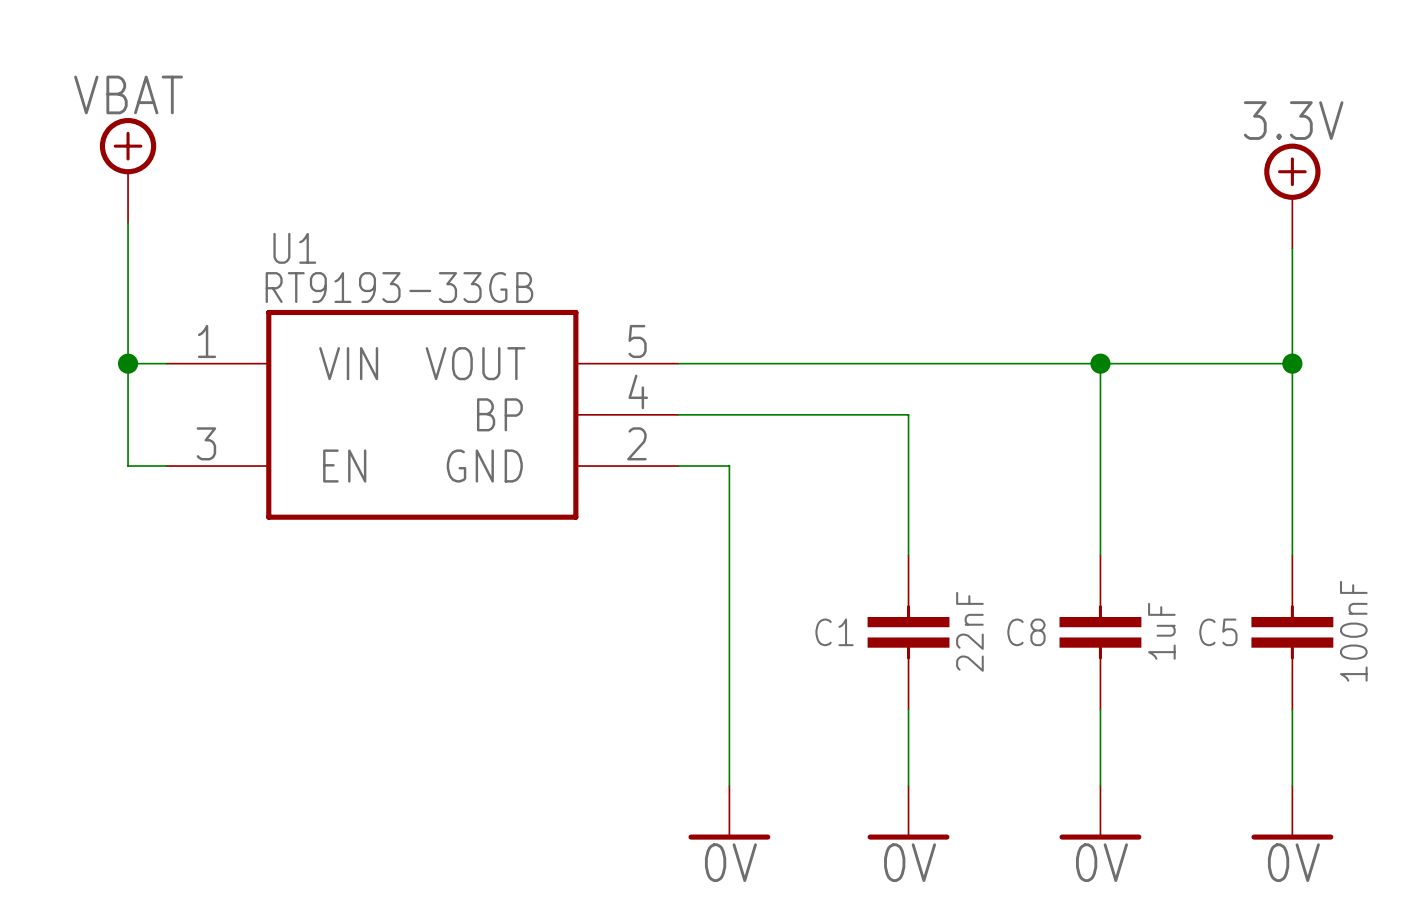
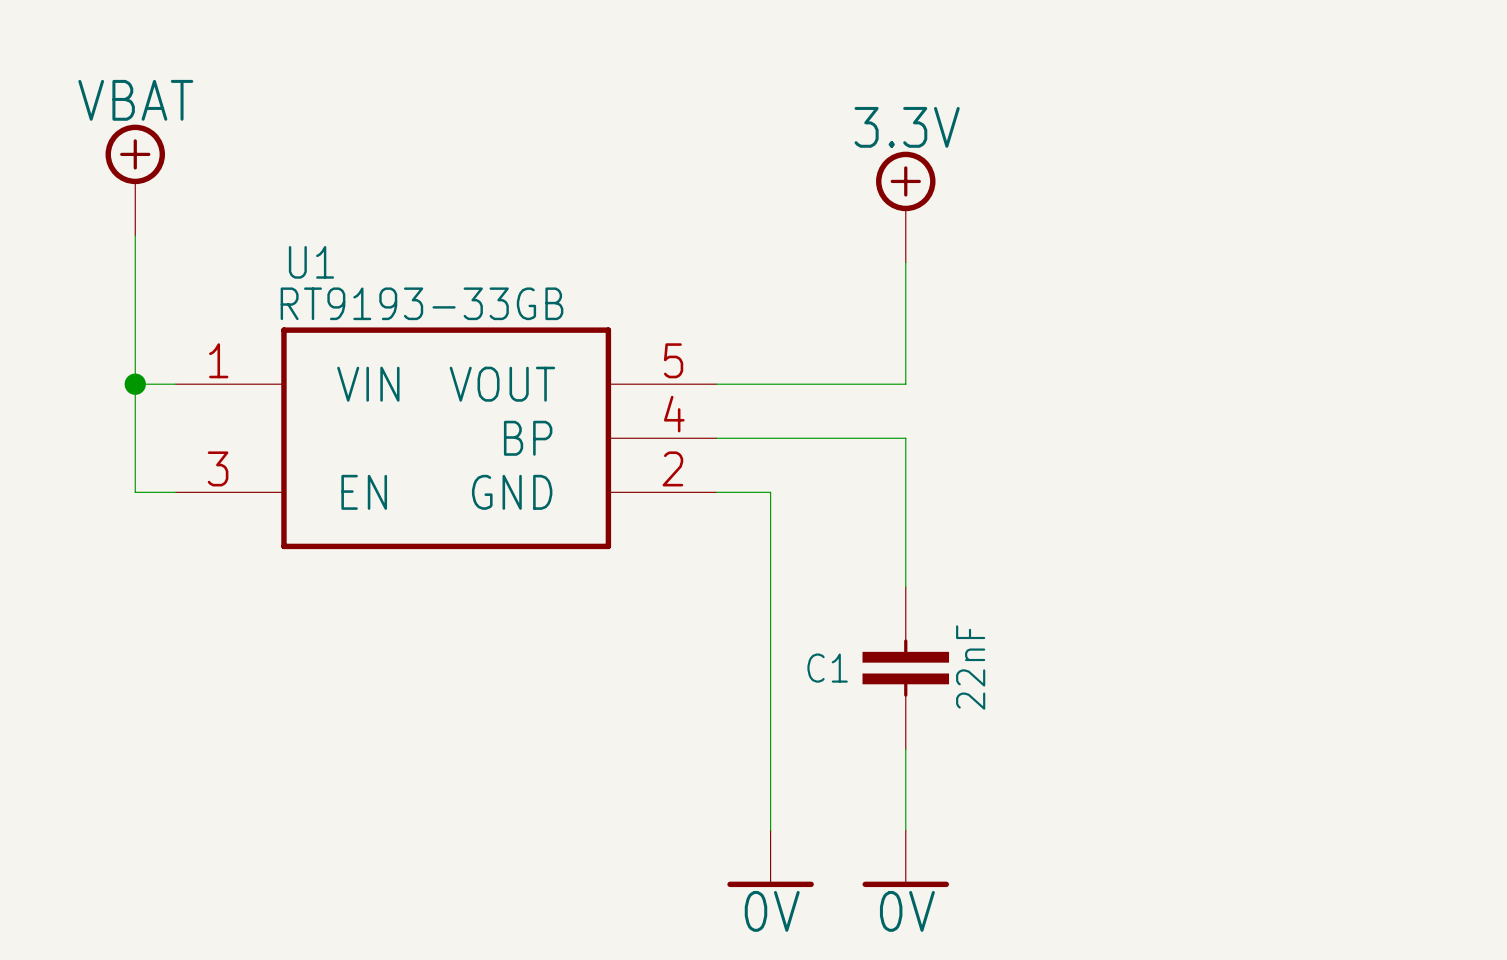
power symbol position: 3.3V (1292, 196) -> 3.3V (905, 207)
wire: (1292, 248) (1292, 555) -> none
wire: (857, 363) (1292, 363) -> (905, 384) (905, 262)
wire: (1100, 363) (1100, 555) -> none
junction: (1100, 363) -> none
junction: (1292, 363) -> none
wire: (857, 414) (908, 414) (908, 555) -> (905, 438) (905, 586)
C1 position: (908, 632) -> (905, 668)
C8: 1uF (1100, 632) -> none
C5: 100nF (1292, 632) -> none
wire: (908, 709) (908, 785) -> (905, 749) (905, 830)
wire: (1100, 709) (1100, 785) -> none
wire: (1292, 709) (1292, 785) -> none
power symbol position: 0V (908, 812) -> 0V (905, 858)
power symbol: 0V (1100, 812) -> none
power symbol: 0V (1292, 812) -> none

